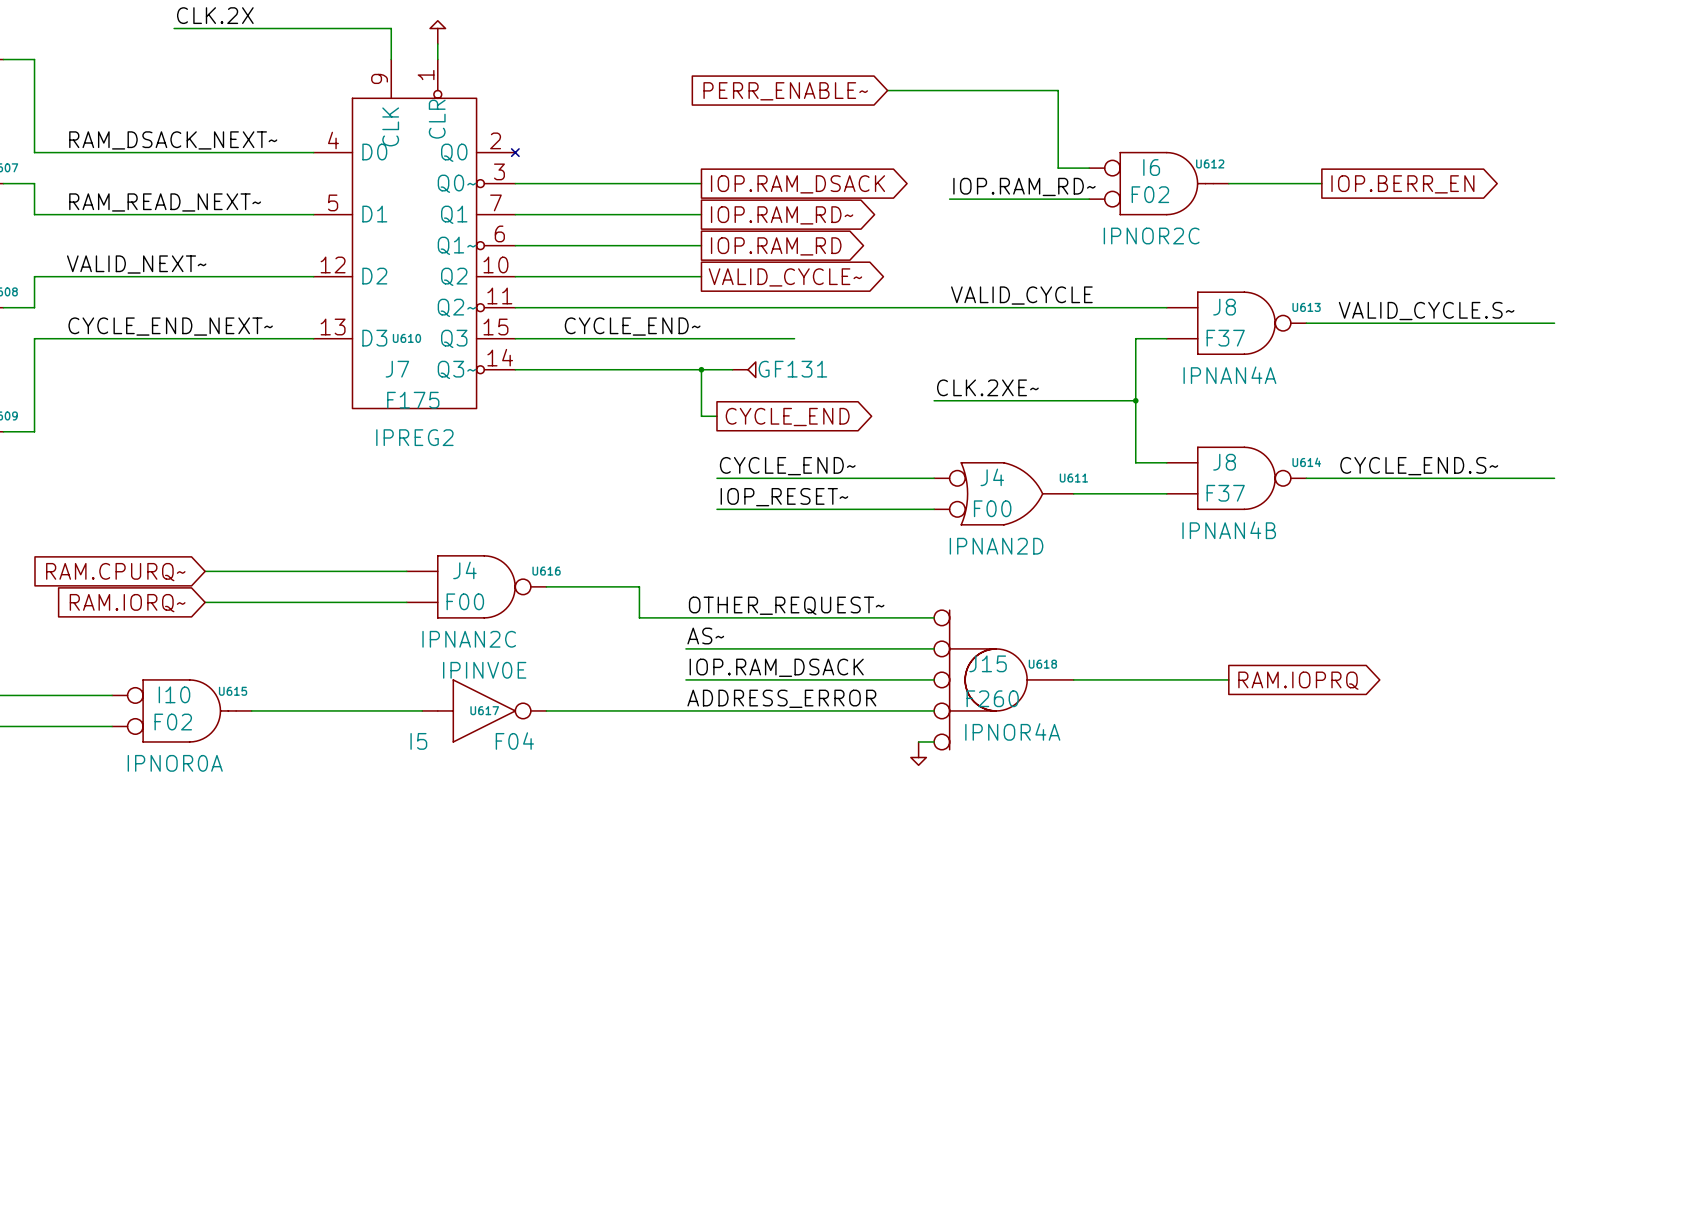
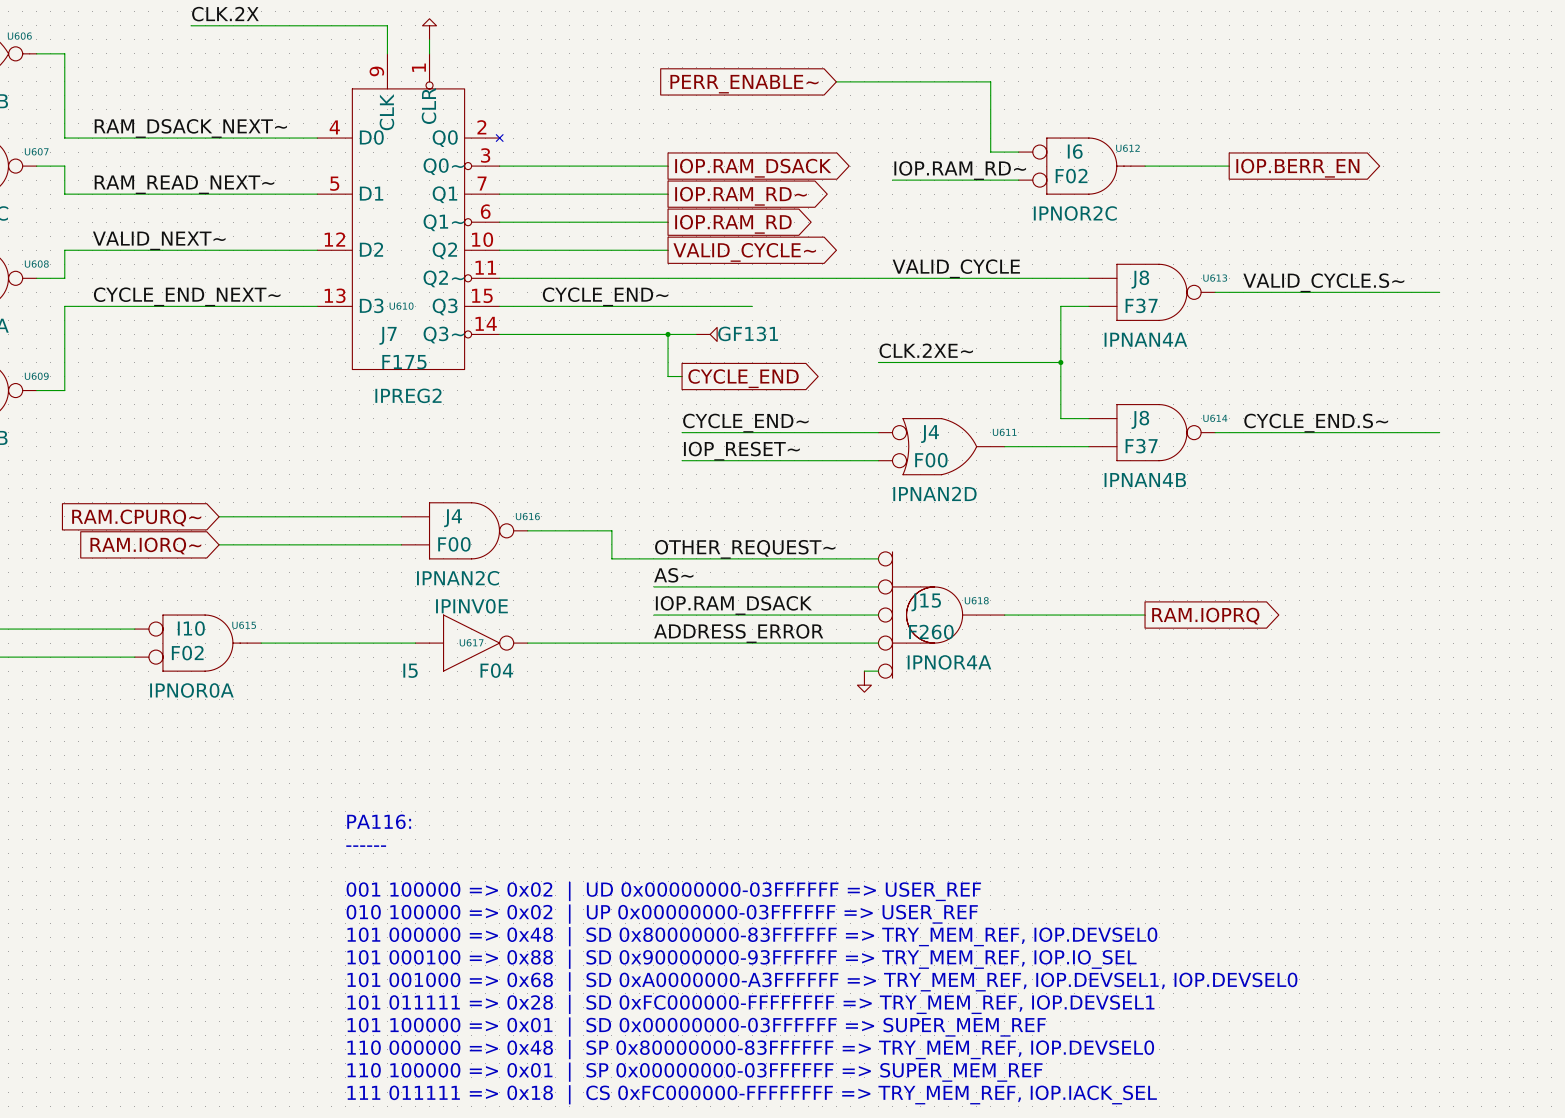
text: none -> PA116: (379, 821)
text: none -> ------ (366, 846)
text: none -> 001 100000 => 0x02 | UD 0x00000000-03FFFFFF => USER_REF (663, 891)
text: none -> 010 100000 => 0x02 | UP 0x00000000-03FFFFFF => USER_REF (662, 914)
text: none -> 101 000000 => 0x48 | SD 0x80000000-83FFFFFF => TRY_MEM_REF, IOP.DEVSEL0 (752, 936)
text: none -> 101 000100 => 0x88 | SD 0x90000000-93FFFFFF => TRY_MEM_REF, IOP.IO_SEL (742, 959)
text: none -> 101 001000 => 0x68 | SD 0xA0000000-A3FFFFFF => TRY_MEM_REF, IOP.DEVSEL1, IOP.DEVSEL0 (822, 981)
text: none -> 101 011111 => 0x28 | SD 0xFC000000-FFFFFFFF => TRY_MEM_REF, IOP.DEVSEL1 (750, 1004)
text: none -> 101 100000 => 0x01 | SD 0x00000000-03FFFFFF => SUPER_MEM_REF (696, 1027)
text: none -> 110 000000 => 0x48 | SP 0x80000000-83FFFFFF => TRY_MEM_REF, IOP.DEVSEL0 (750, 1049)
text: none -> 110 100000 => 0x01 | SP 0x00000000-03FFFFFF => SUPER_MEM_REF (695, 1072)
text: none -> 111 011111 => 0x18 | CS 0xFC000000-FFFFFFFF => TRY_MEM_REF, IOP.IACK_SEL (752, 1094)

